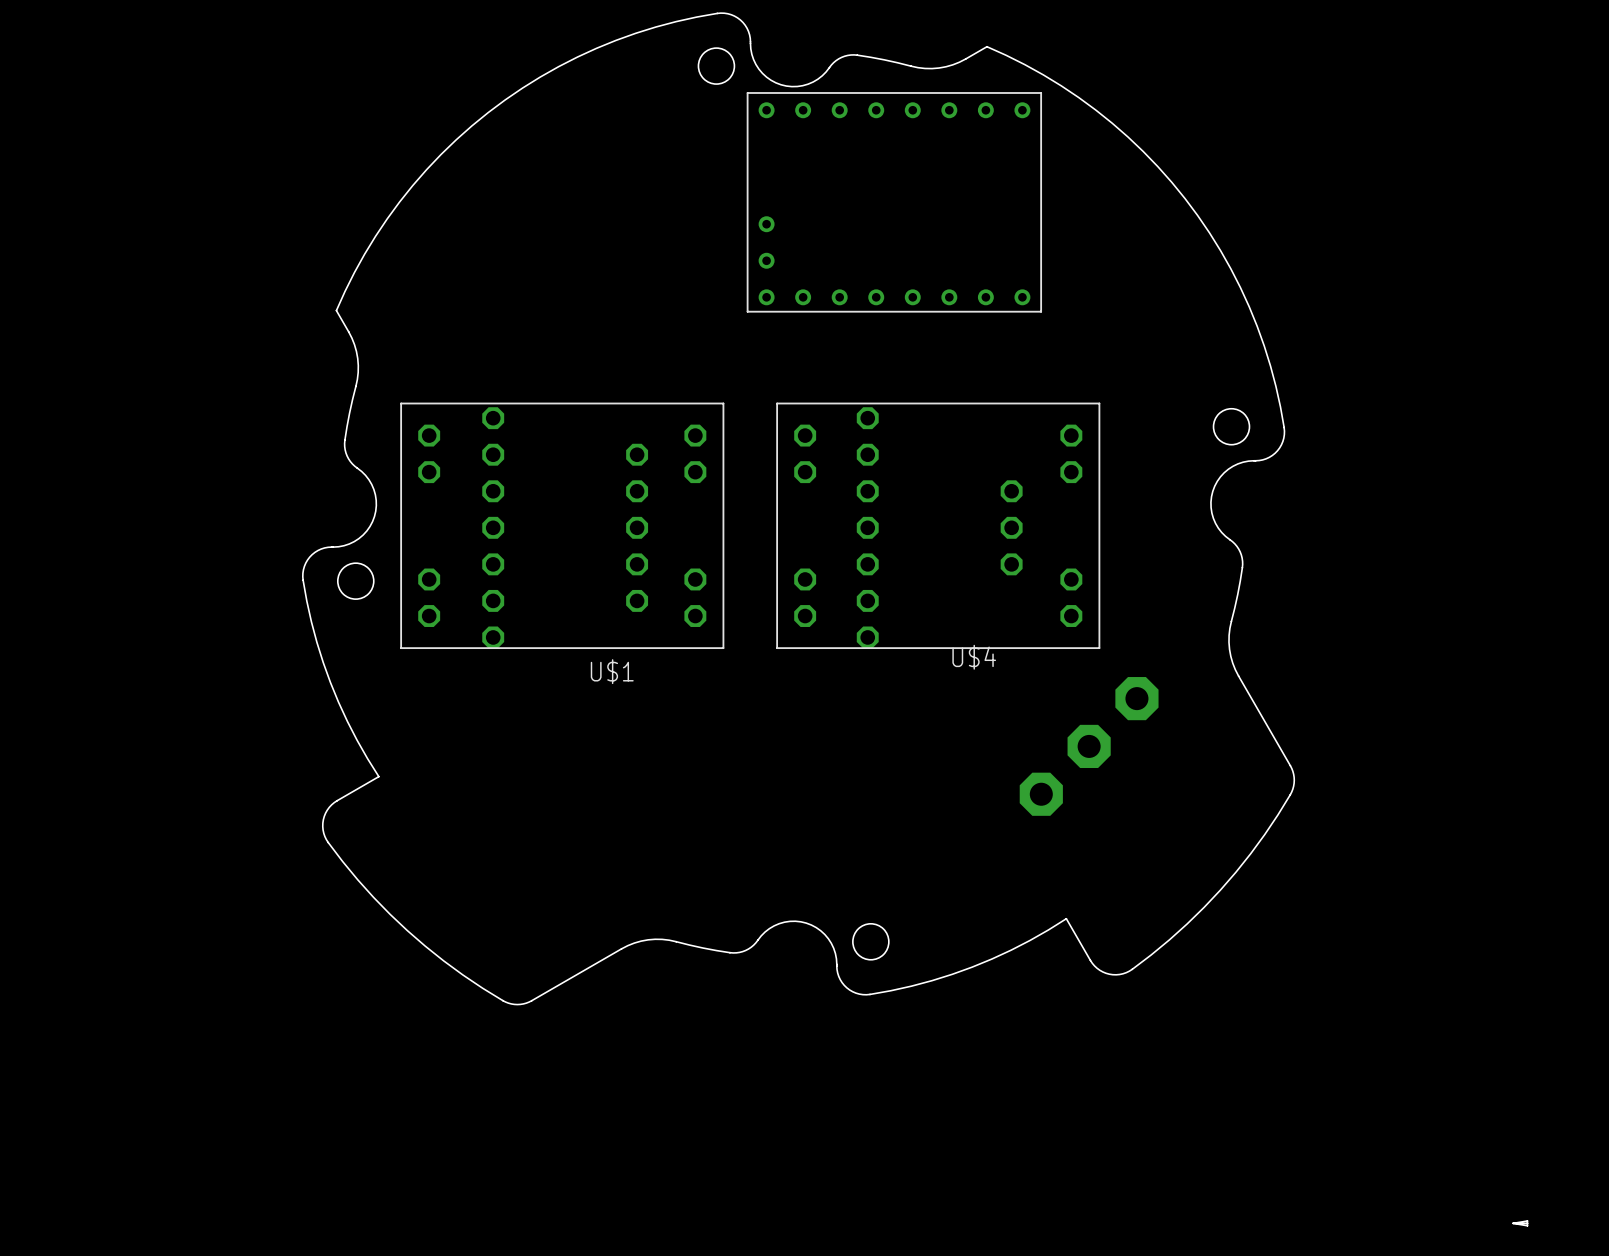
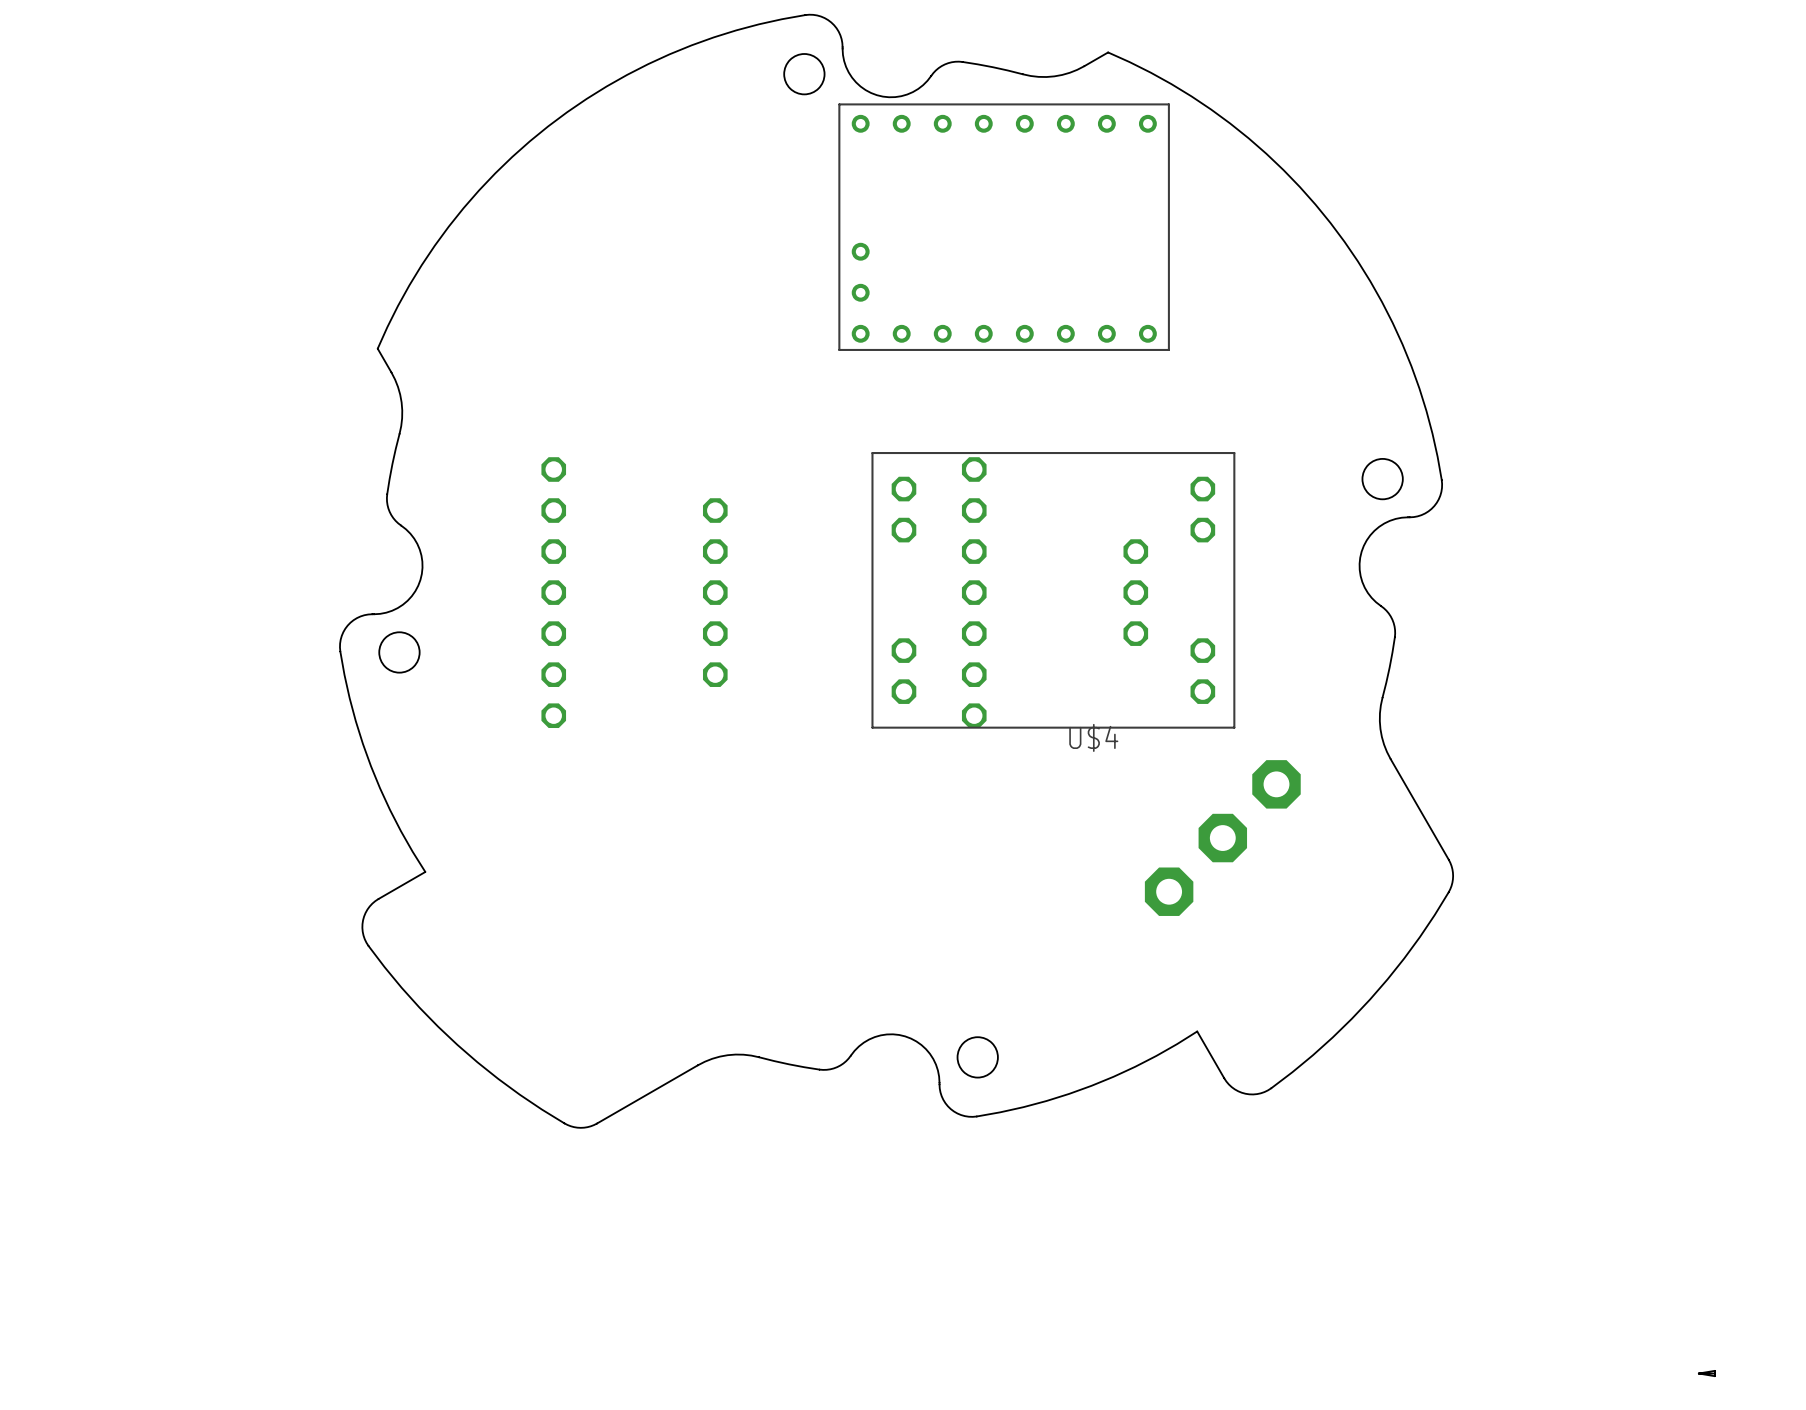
U$1: (562, 525) -> none

